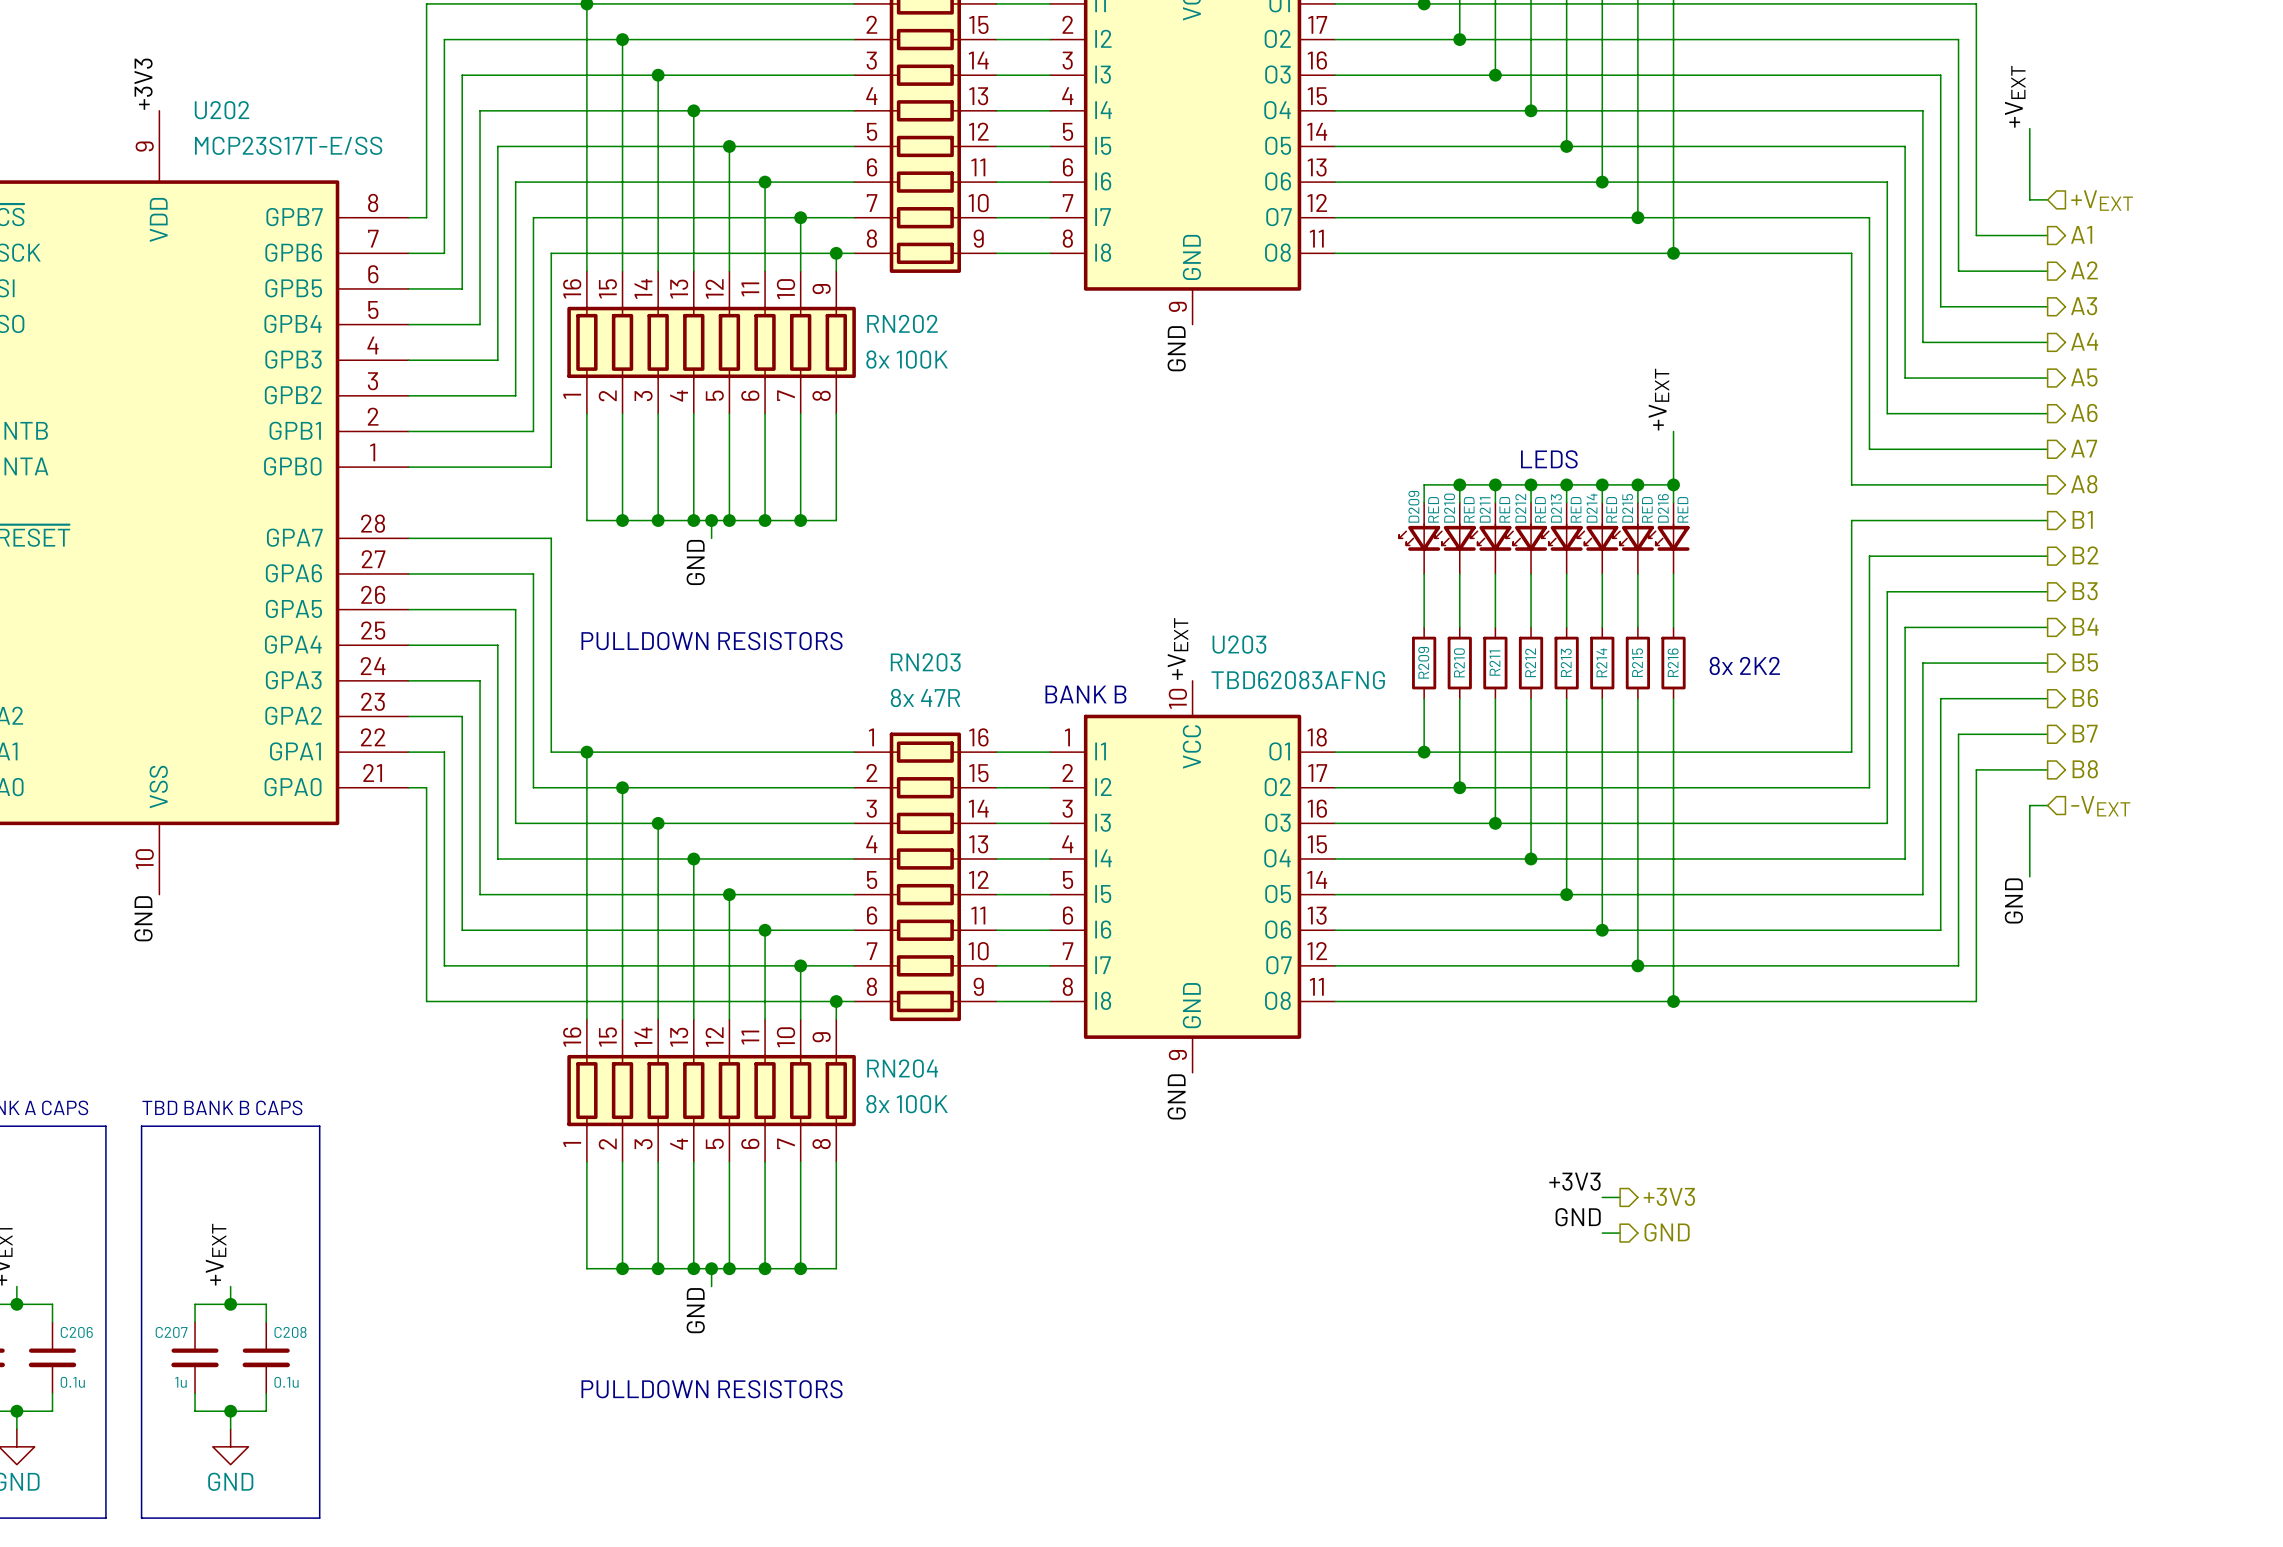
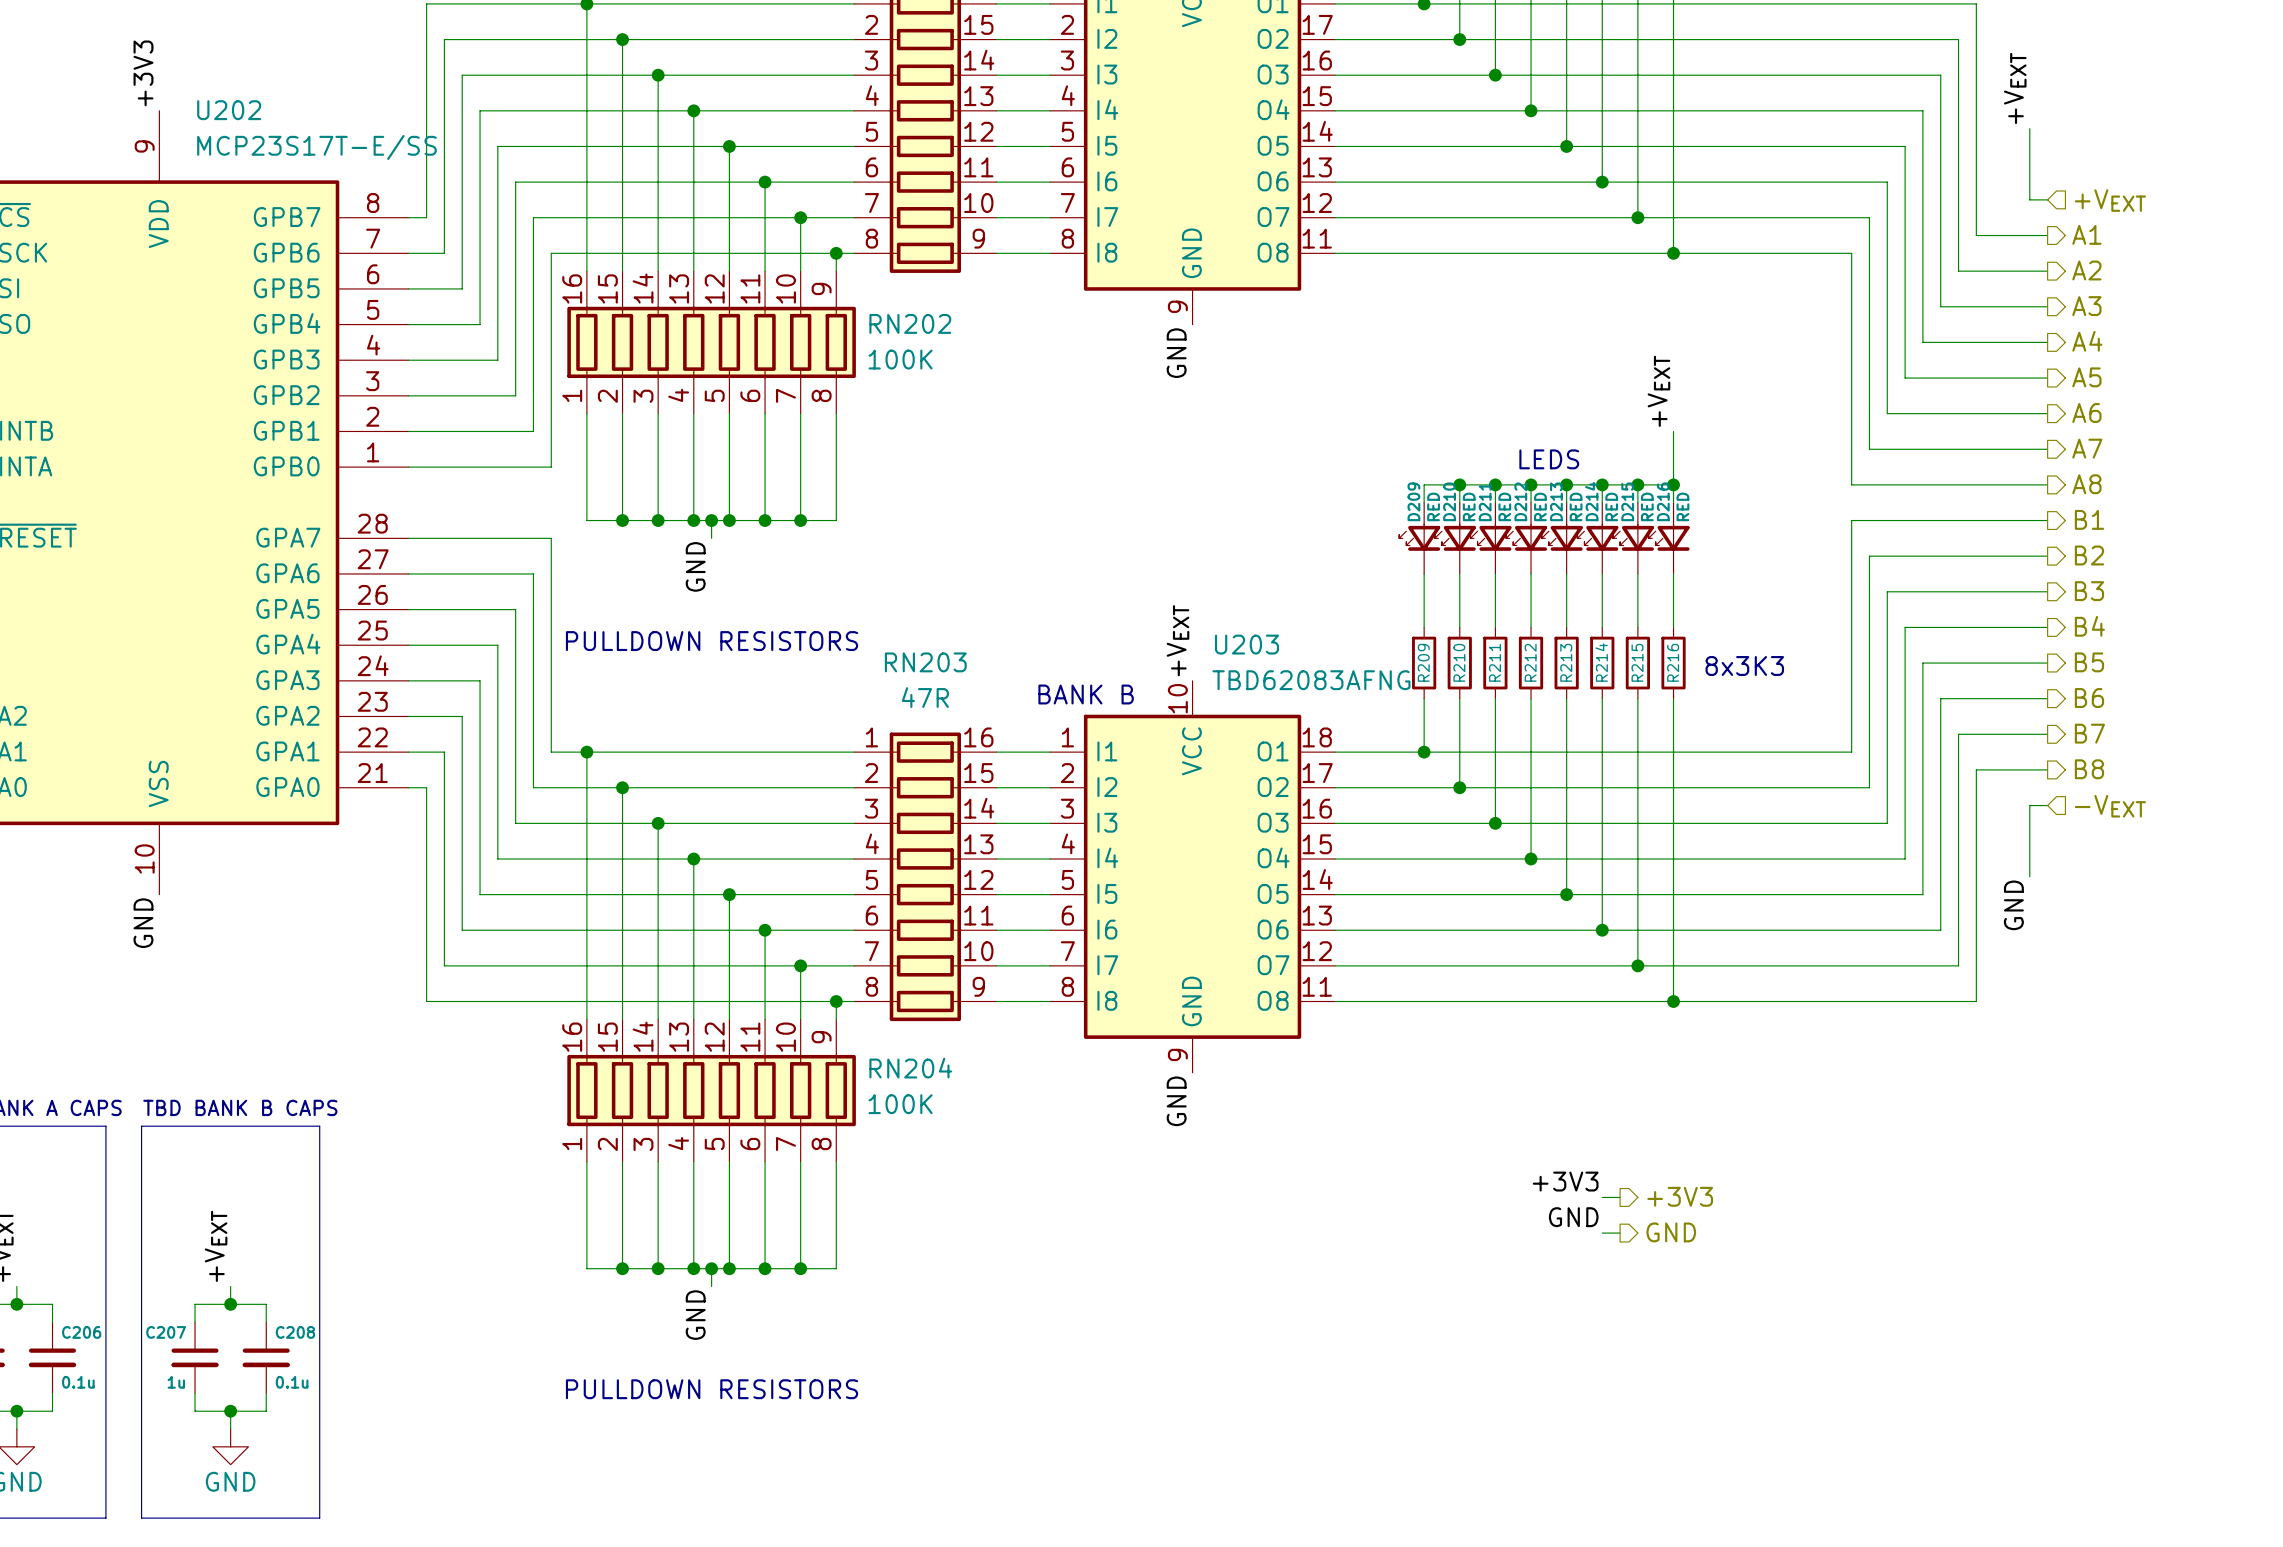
RN202 value: 8x 100K (907, 359) -> 100K (900, 359)
text: 8x 2K2 (1744, 665) -> 8x3K3 (1744, 666)
RN203 value: 8x 47R (925, 697) -> 47R (925, 697)
RN204 value: 8x 100K (907, 1104) -> 100K (900, 1104)

